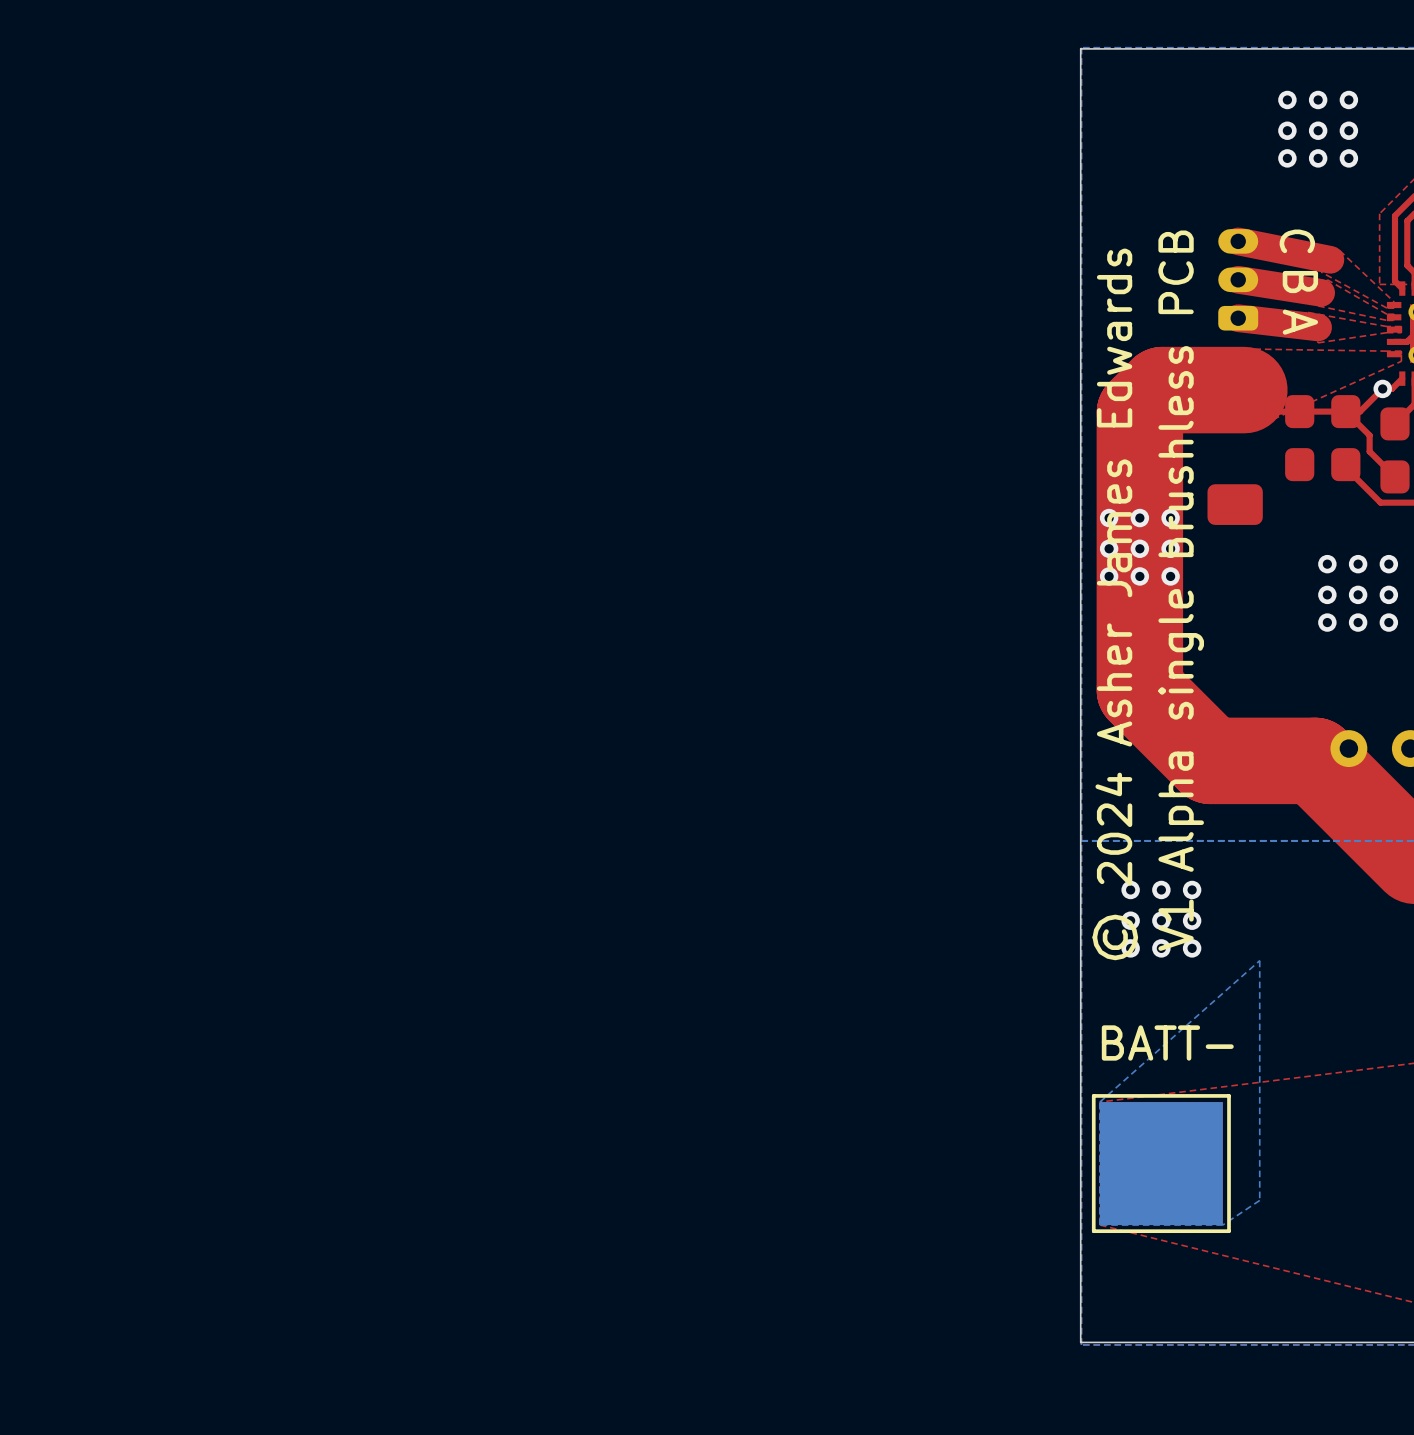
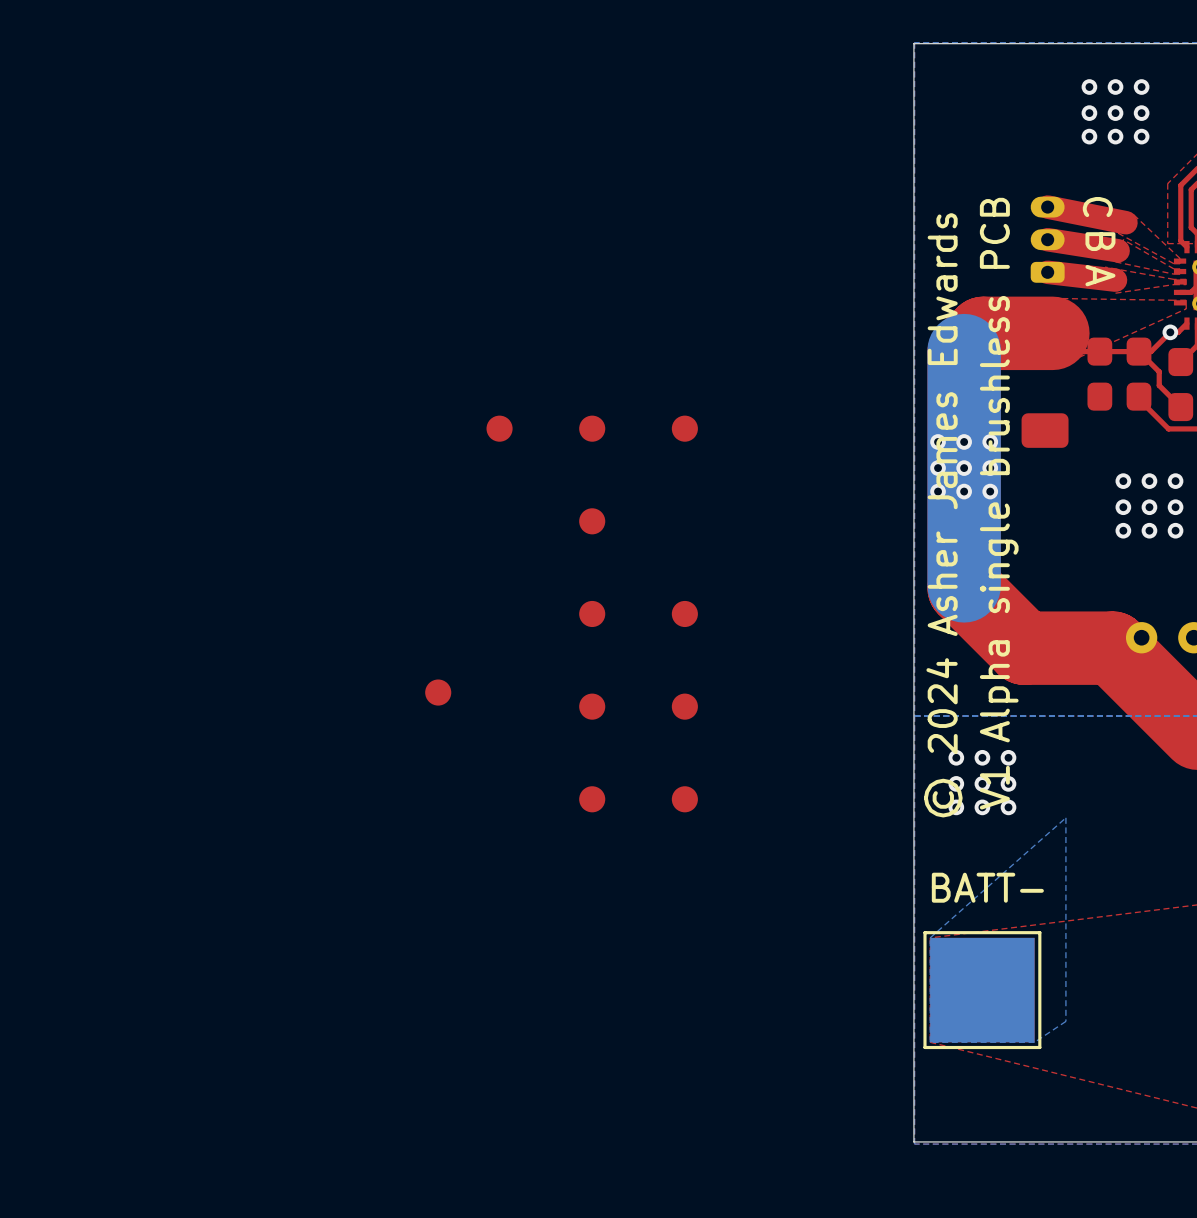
bottom track: none -> (964, 350) (964, 585)
part: none -> (499, 428)
part: none -> (592, 428)
part: none -> (684, 428)
part: none -> (592, 521)
part: none -> (592, 613)
part: none -> (684, 613)
part: none -> (438, 692)
part: none -> (592, 706)
part: none -> (684, 706)
part: none -> (592, 799)
part: none -> (684, 799)

